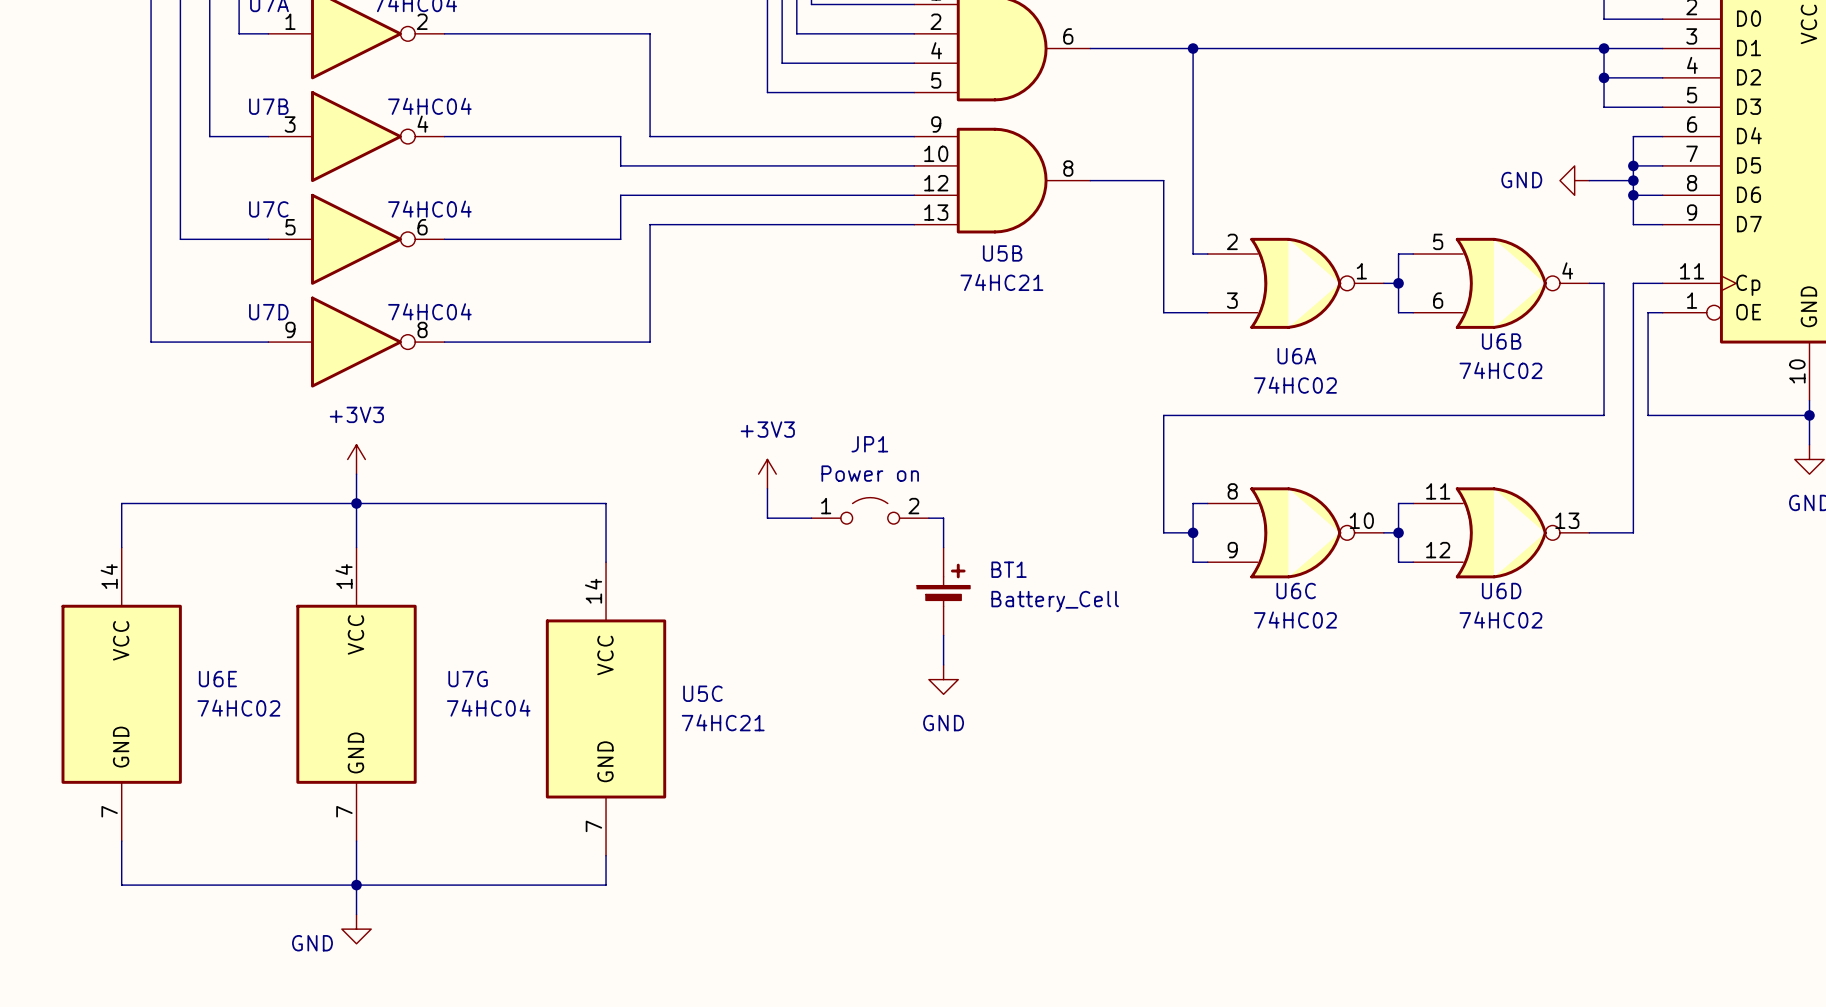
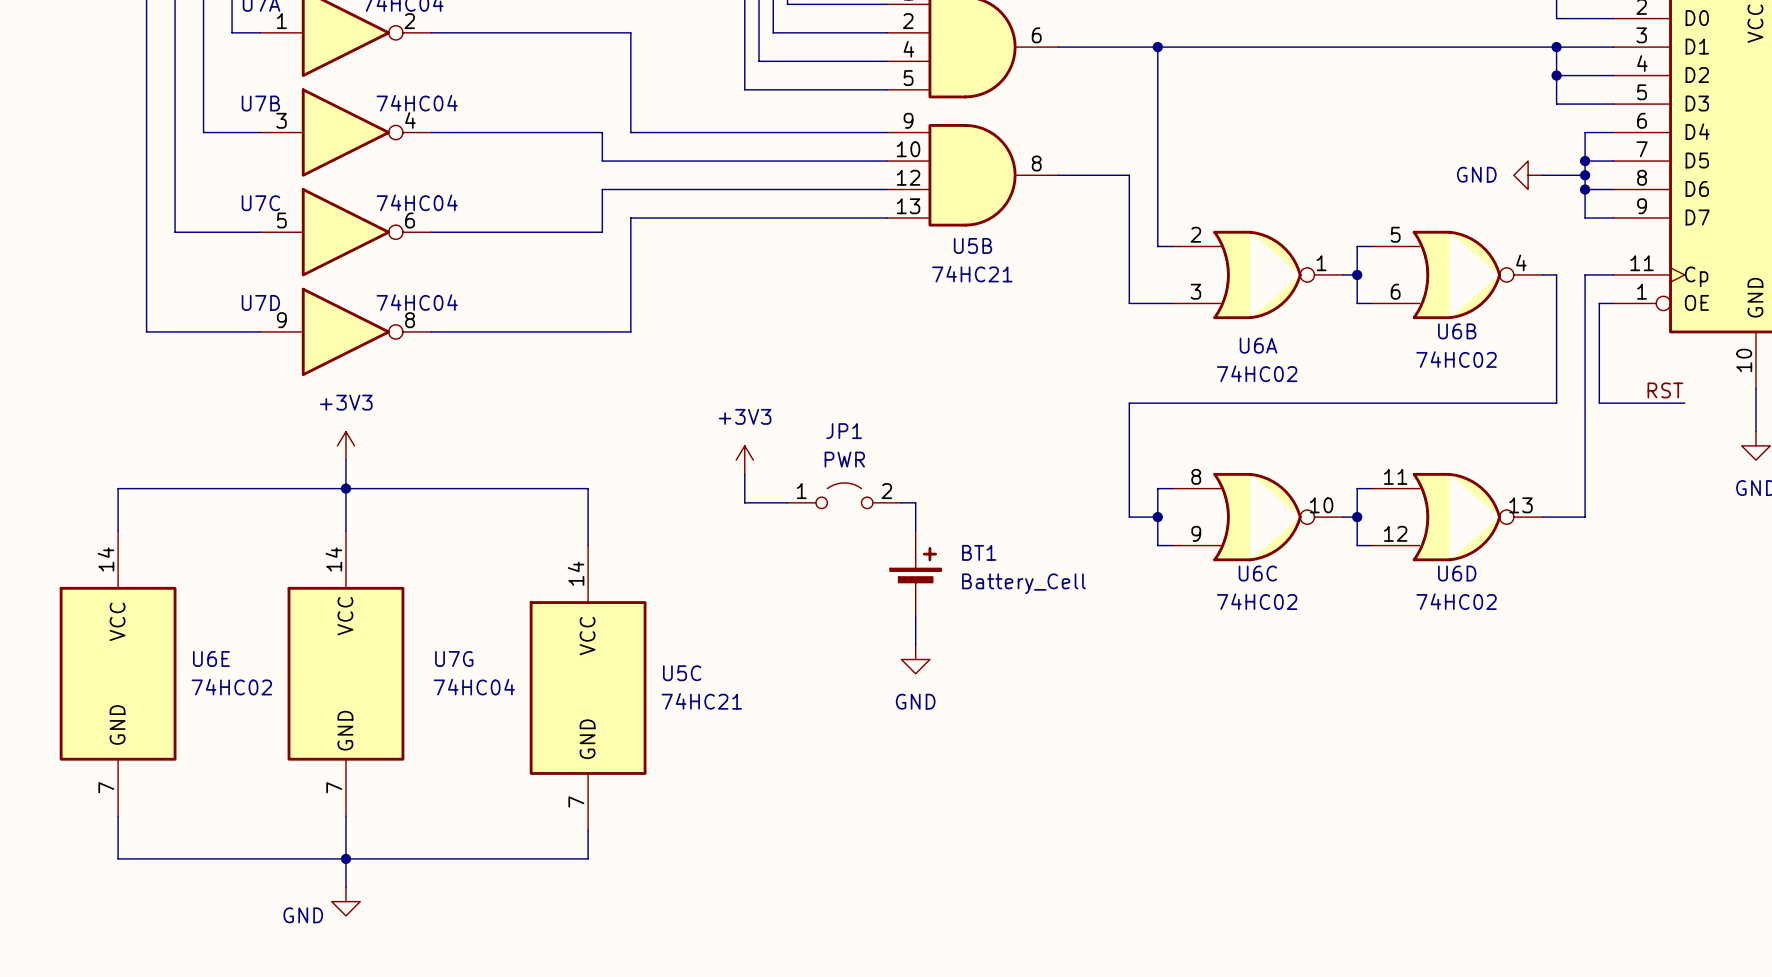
label: none -> RST (1665, 390)
wire: (1736, 415) (1809, 415) -> none
junction: (1809, 415) -> none
JP1 value: Power on (870, 473) -> PWR (844, 459)

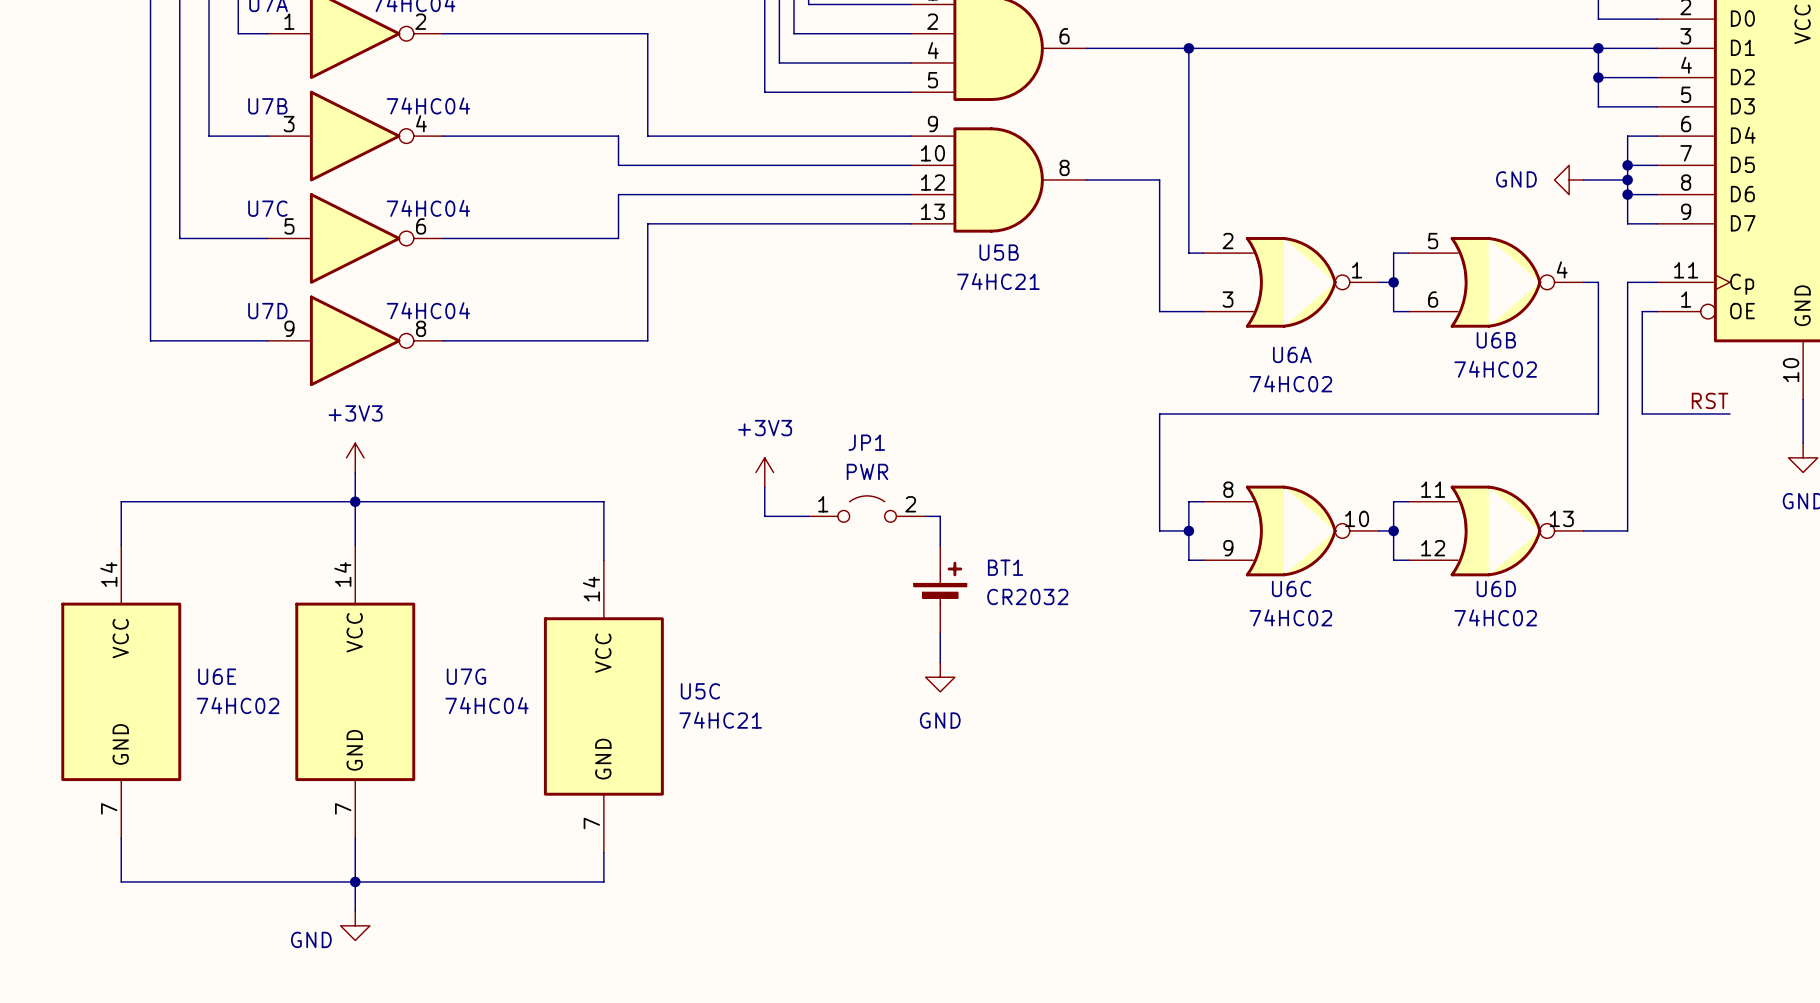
BT1 value: Battery_Cell (1023, 583) -> CR2032 (1027, 596)

